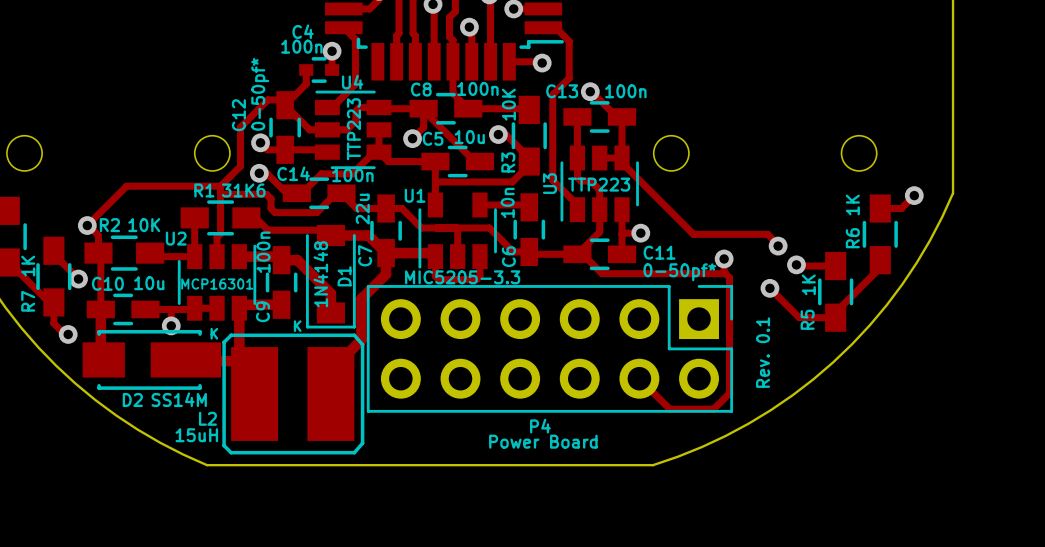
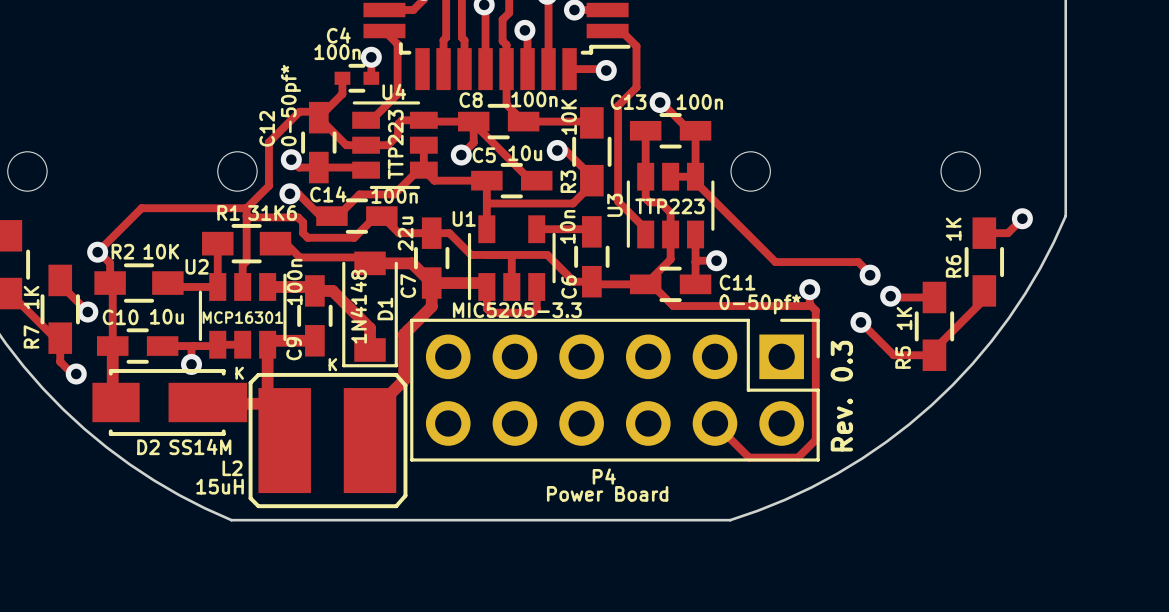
text: Rev. 0.1 (763, 352) -> Rev. 0.3 (841, 396)

